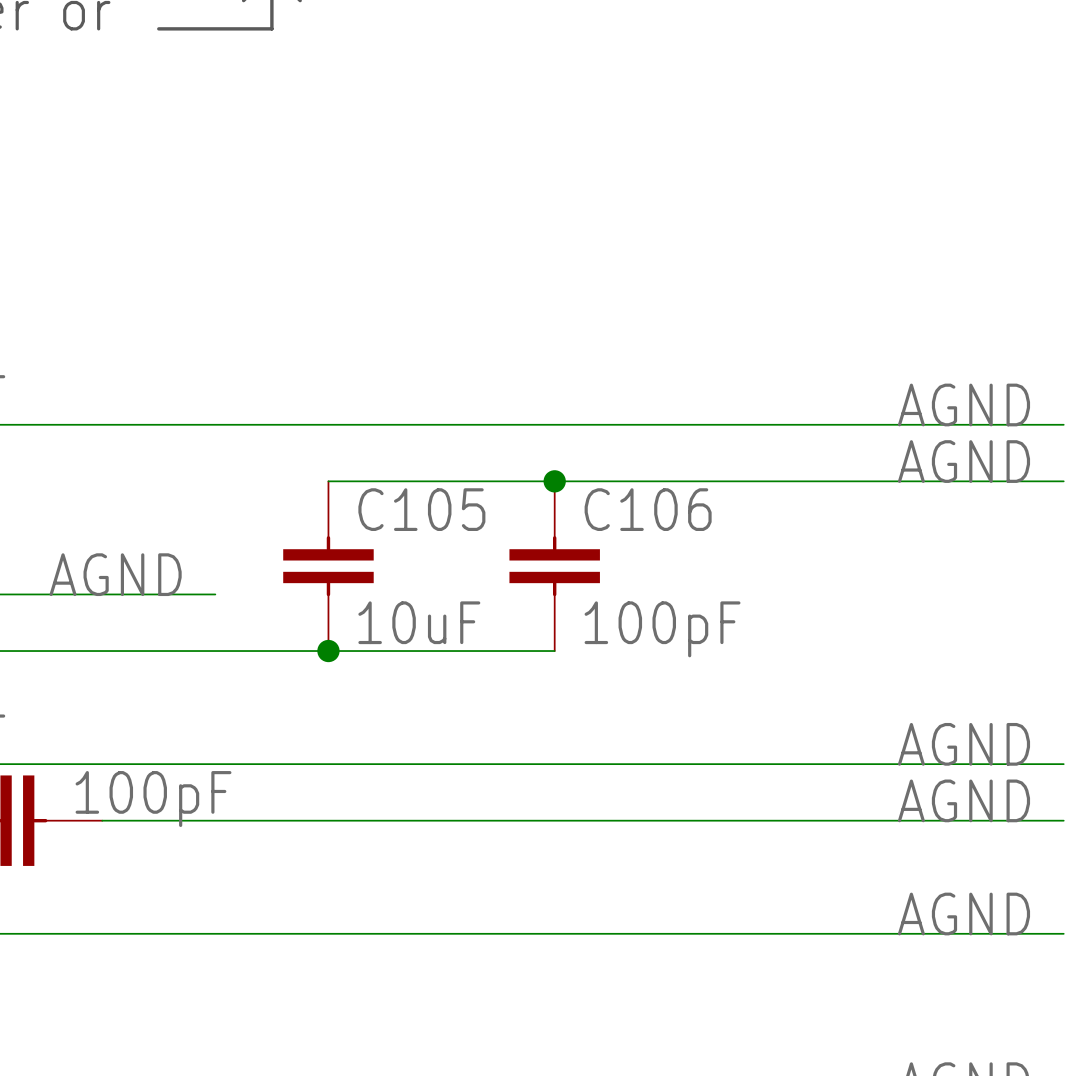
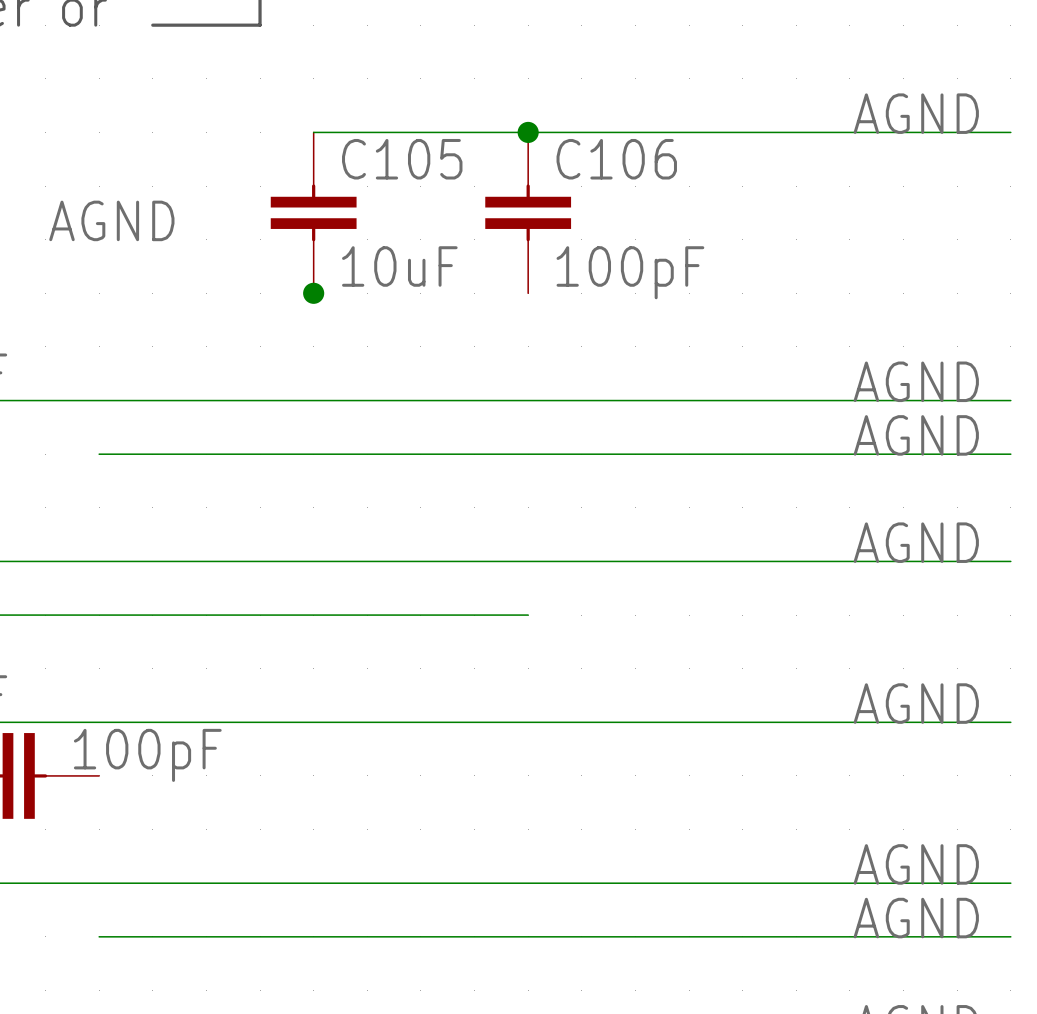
label: none -> AGND (916, 113)
wire: none -> (313, 132) (1010, 132)
junction: none -> (528, 132)
junction: none -> (313, 293)
wire: none -> (99, 454) (313, 454)
junction: (554, 481) -> none
C105 position: (328, 566) -> (313, 212)
C106 position: (554, 566) -> (528, 212)
label position: AGND (115, 574) -> AGND (111, 220)
label: none -> AGND (916, 542)
wire: none -> (206, 561) (1010, 561)
junction: (328, 651) -> none
label: AGND (963, 800) -> none
wire: (102, 820) (1063, 820) -> (99, 936) (1010, 936)
label: none -> AGND (916, 918)

